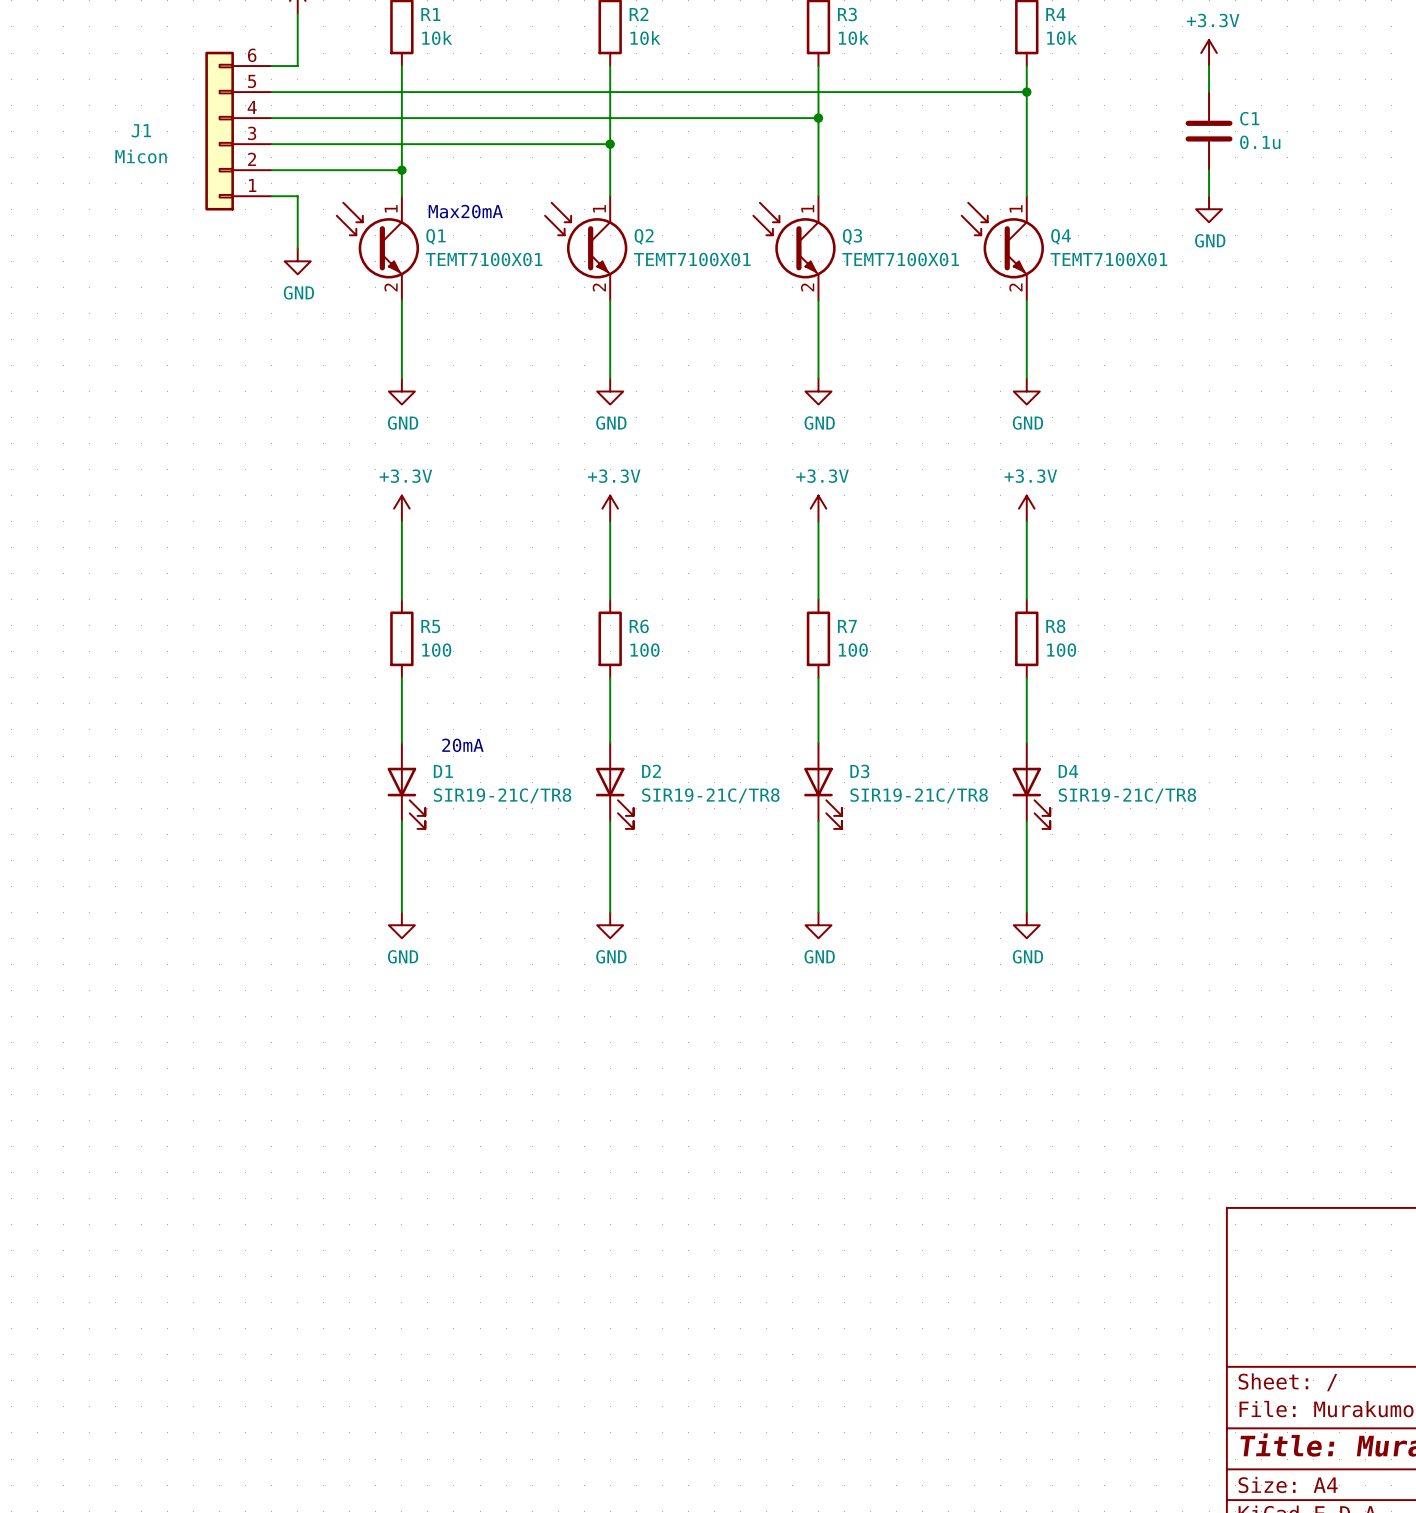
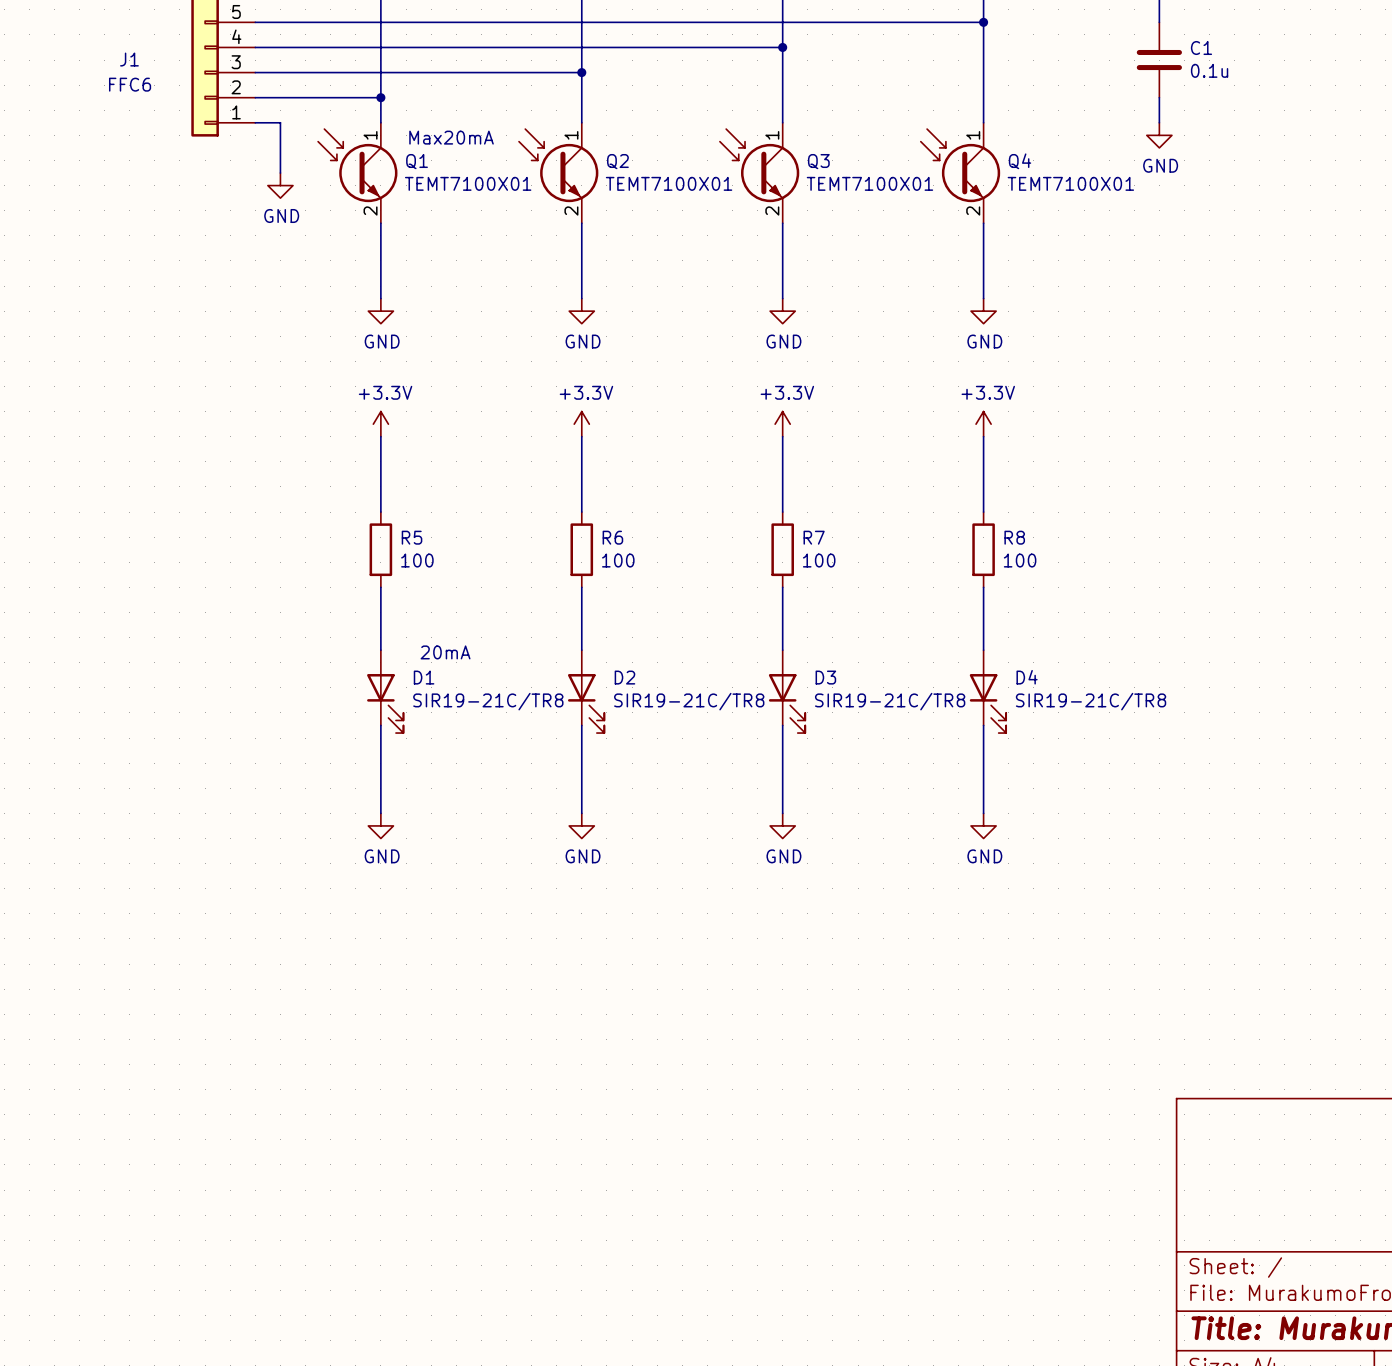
J1 value: Micon (141, 156) -> FFC6 (130, 84)

